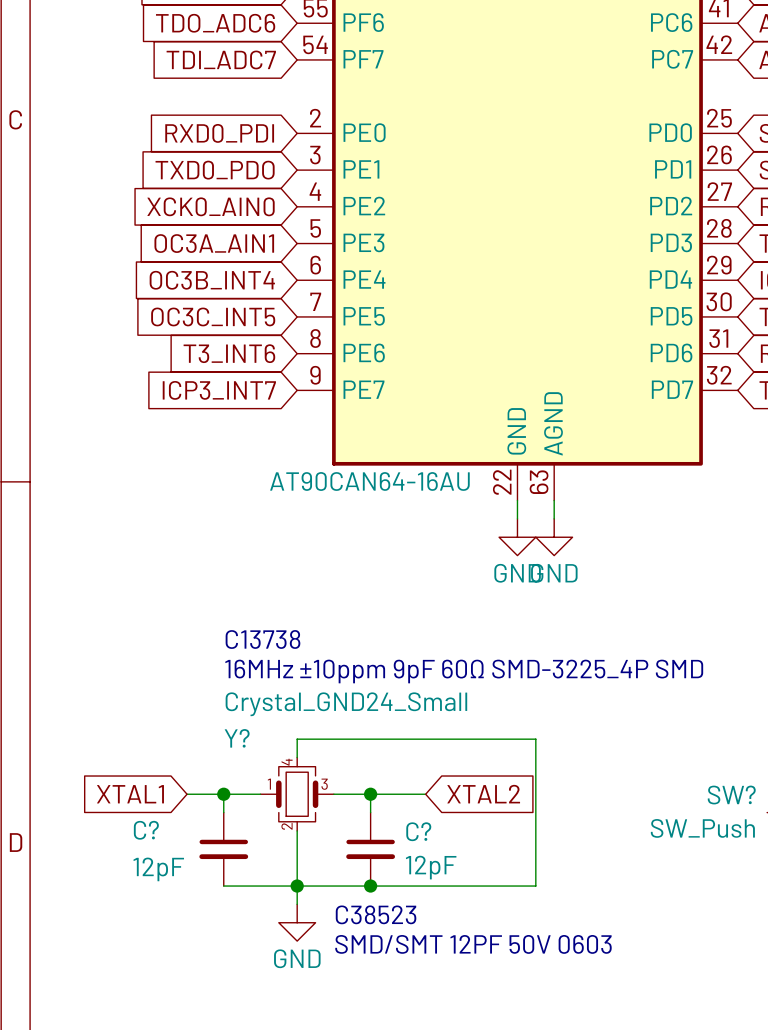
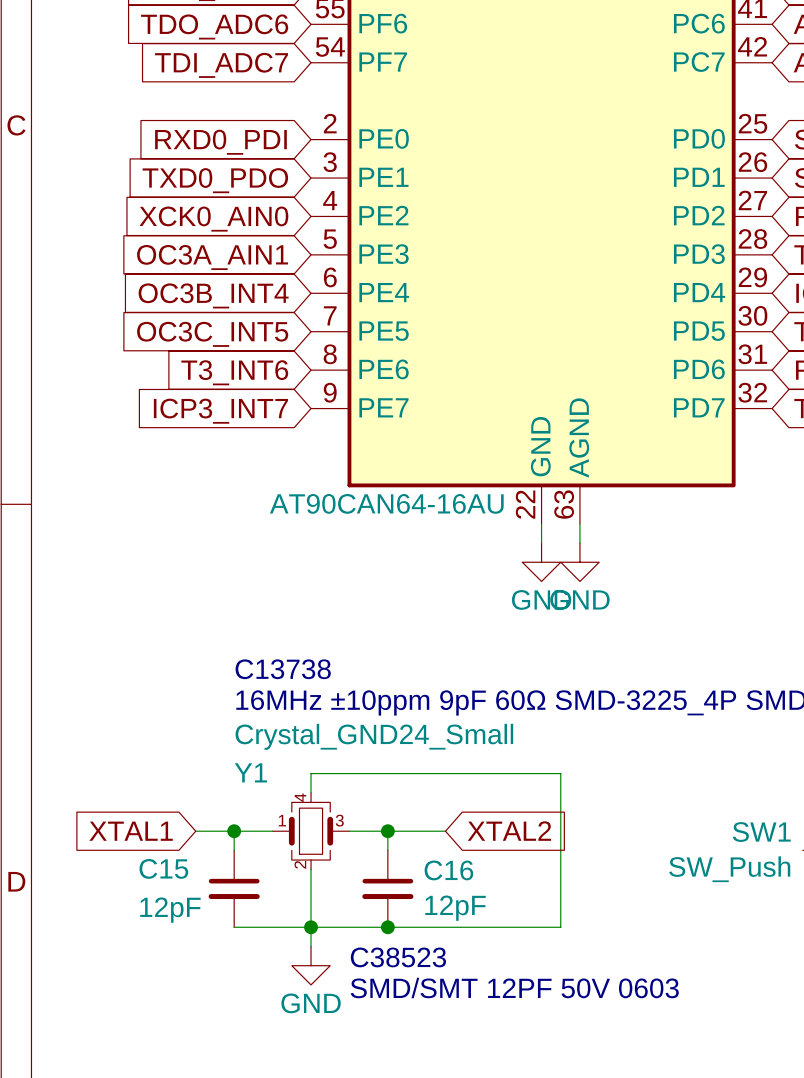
Y? name: Y? (237, 738) -> Y1 (250, 772)
SW? name: SW? (731, 795) -> SW1 (761, 832)
C? name: C? (146, 830) -> C15 (163, 868)
C? name: C? (418, 831) -> C16 (448, 870)

